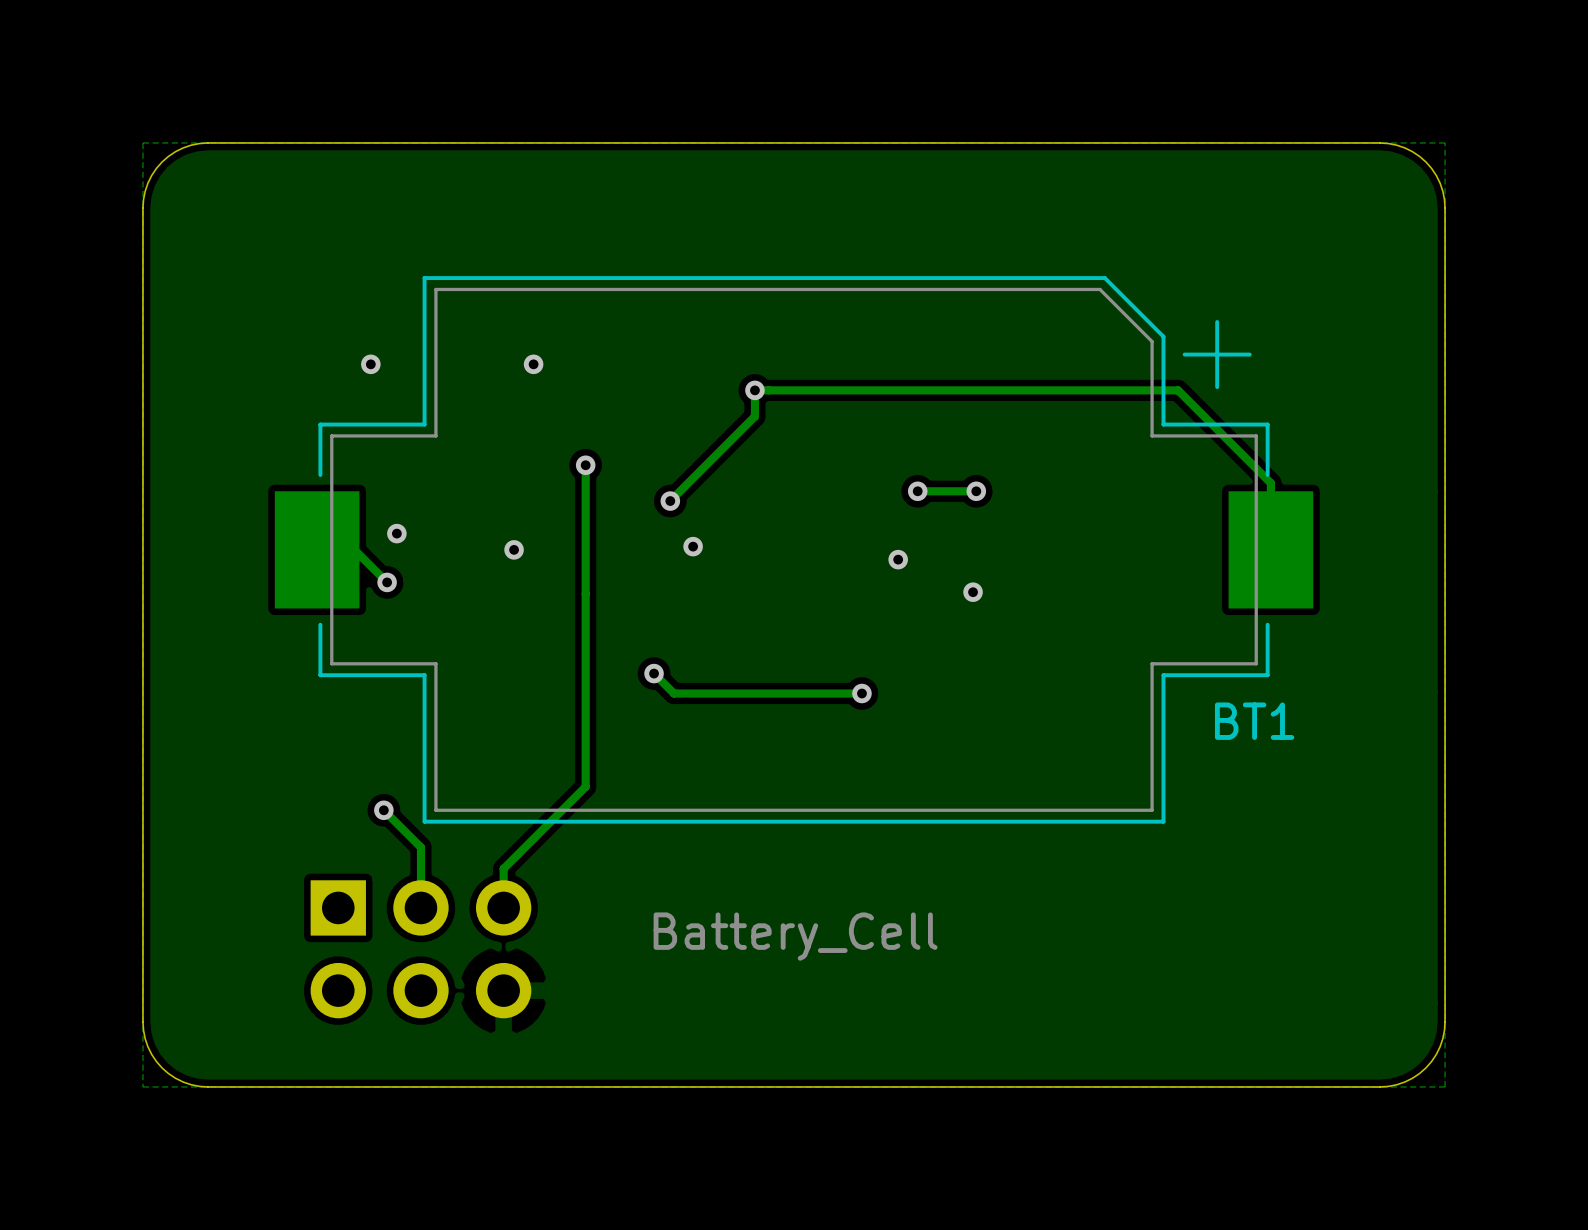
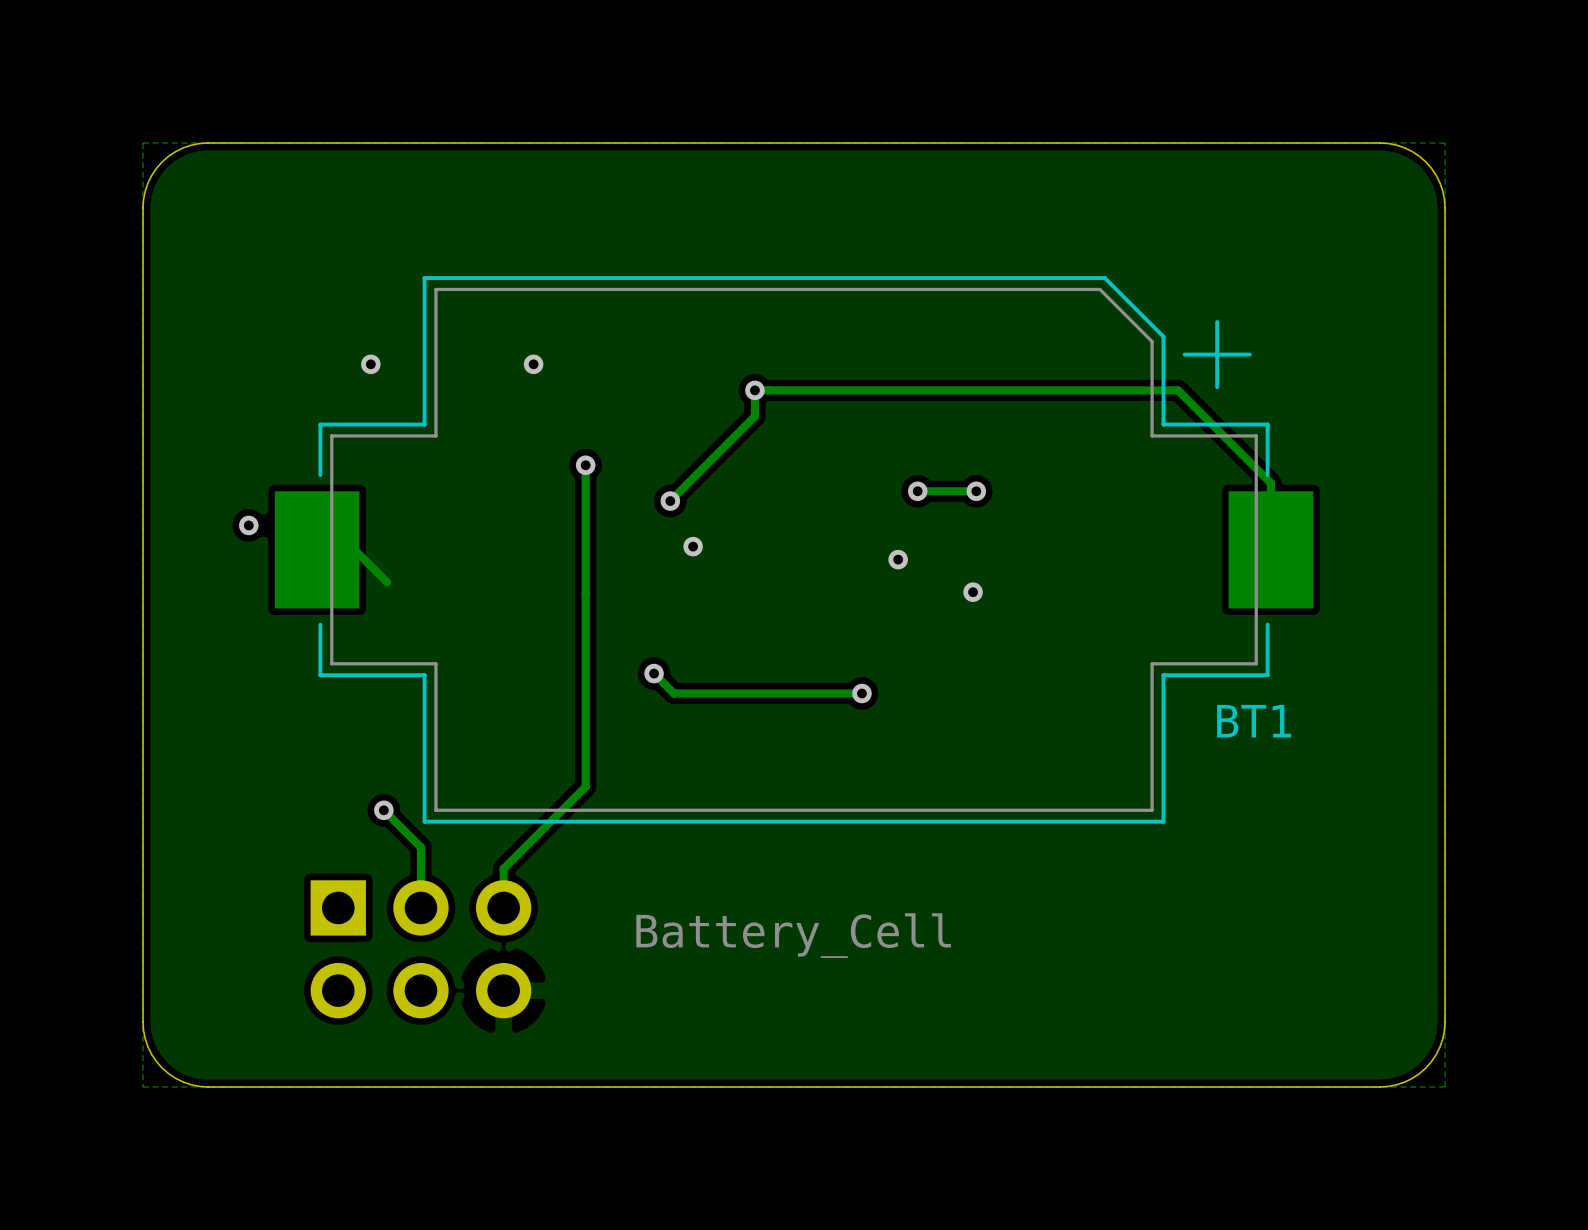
via: none -> (248, 525)
via: (396, 533) -> none
via: (514, 549) -> none
via: (387, 582) -> none

